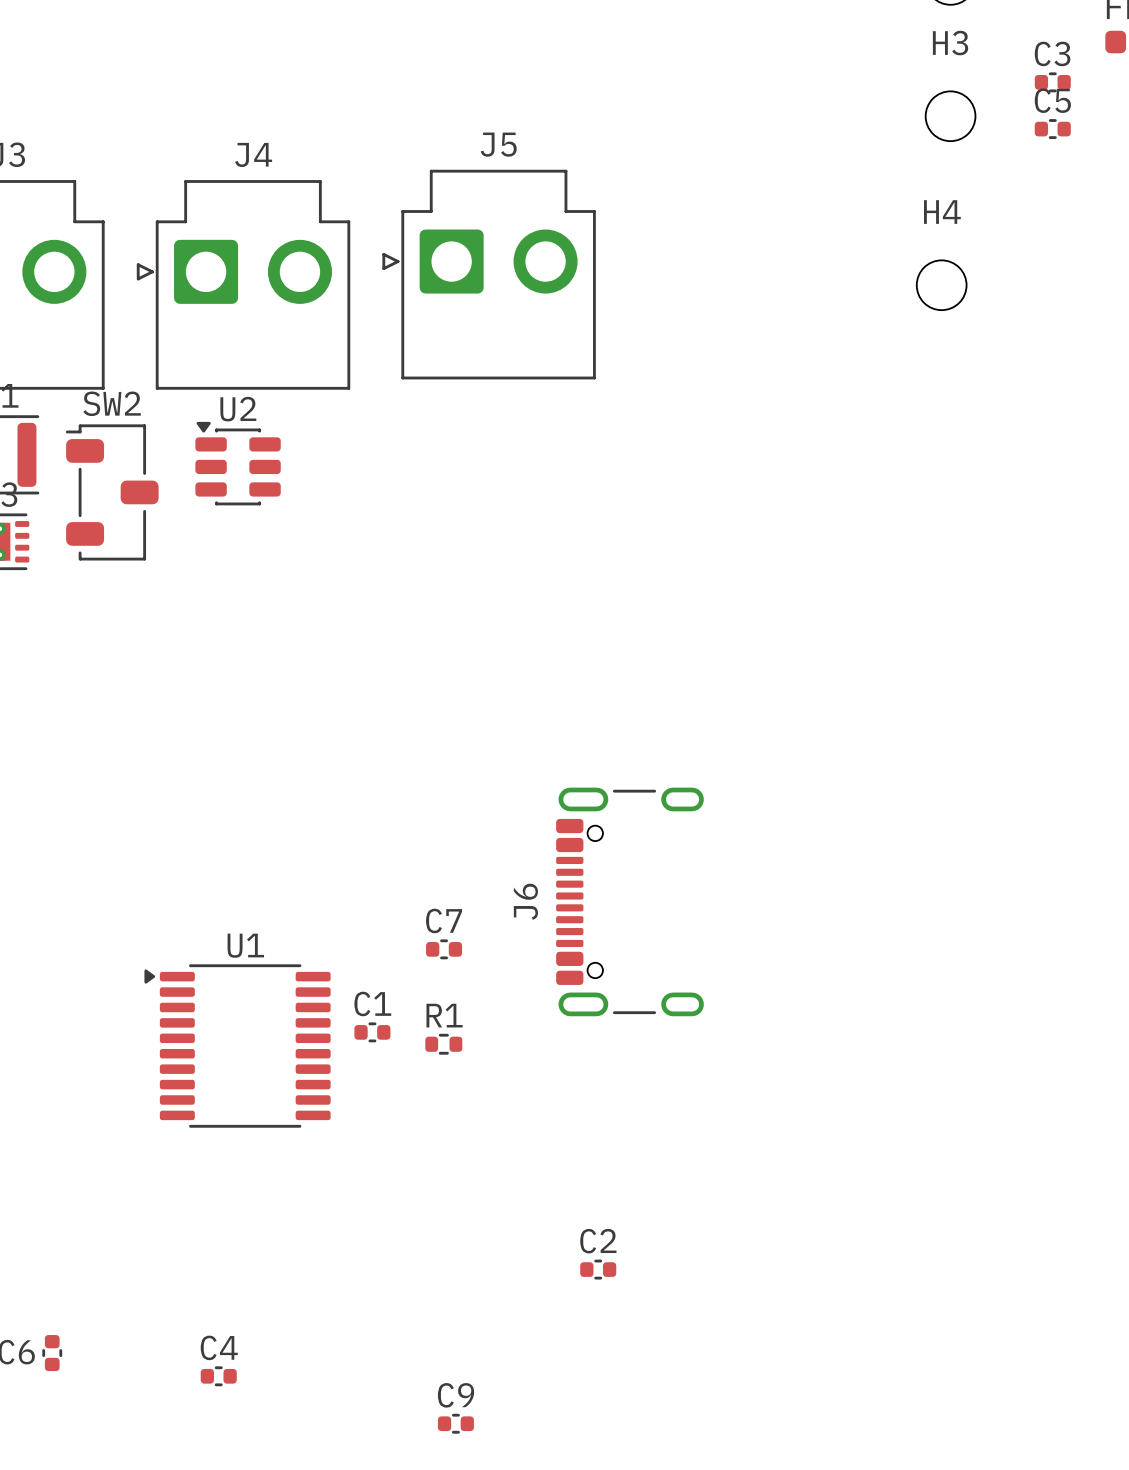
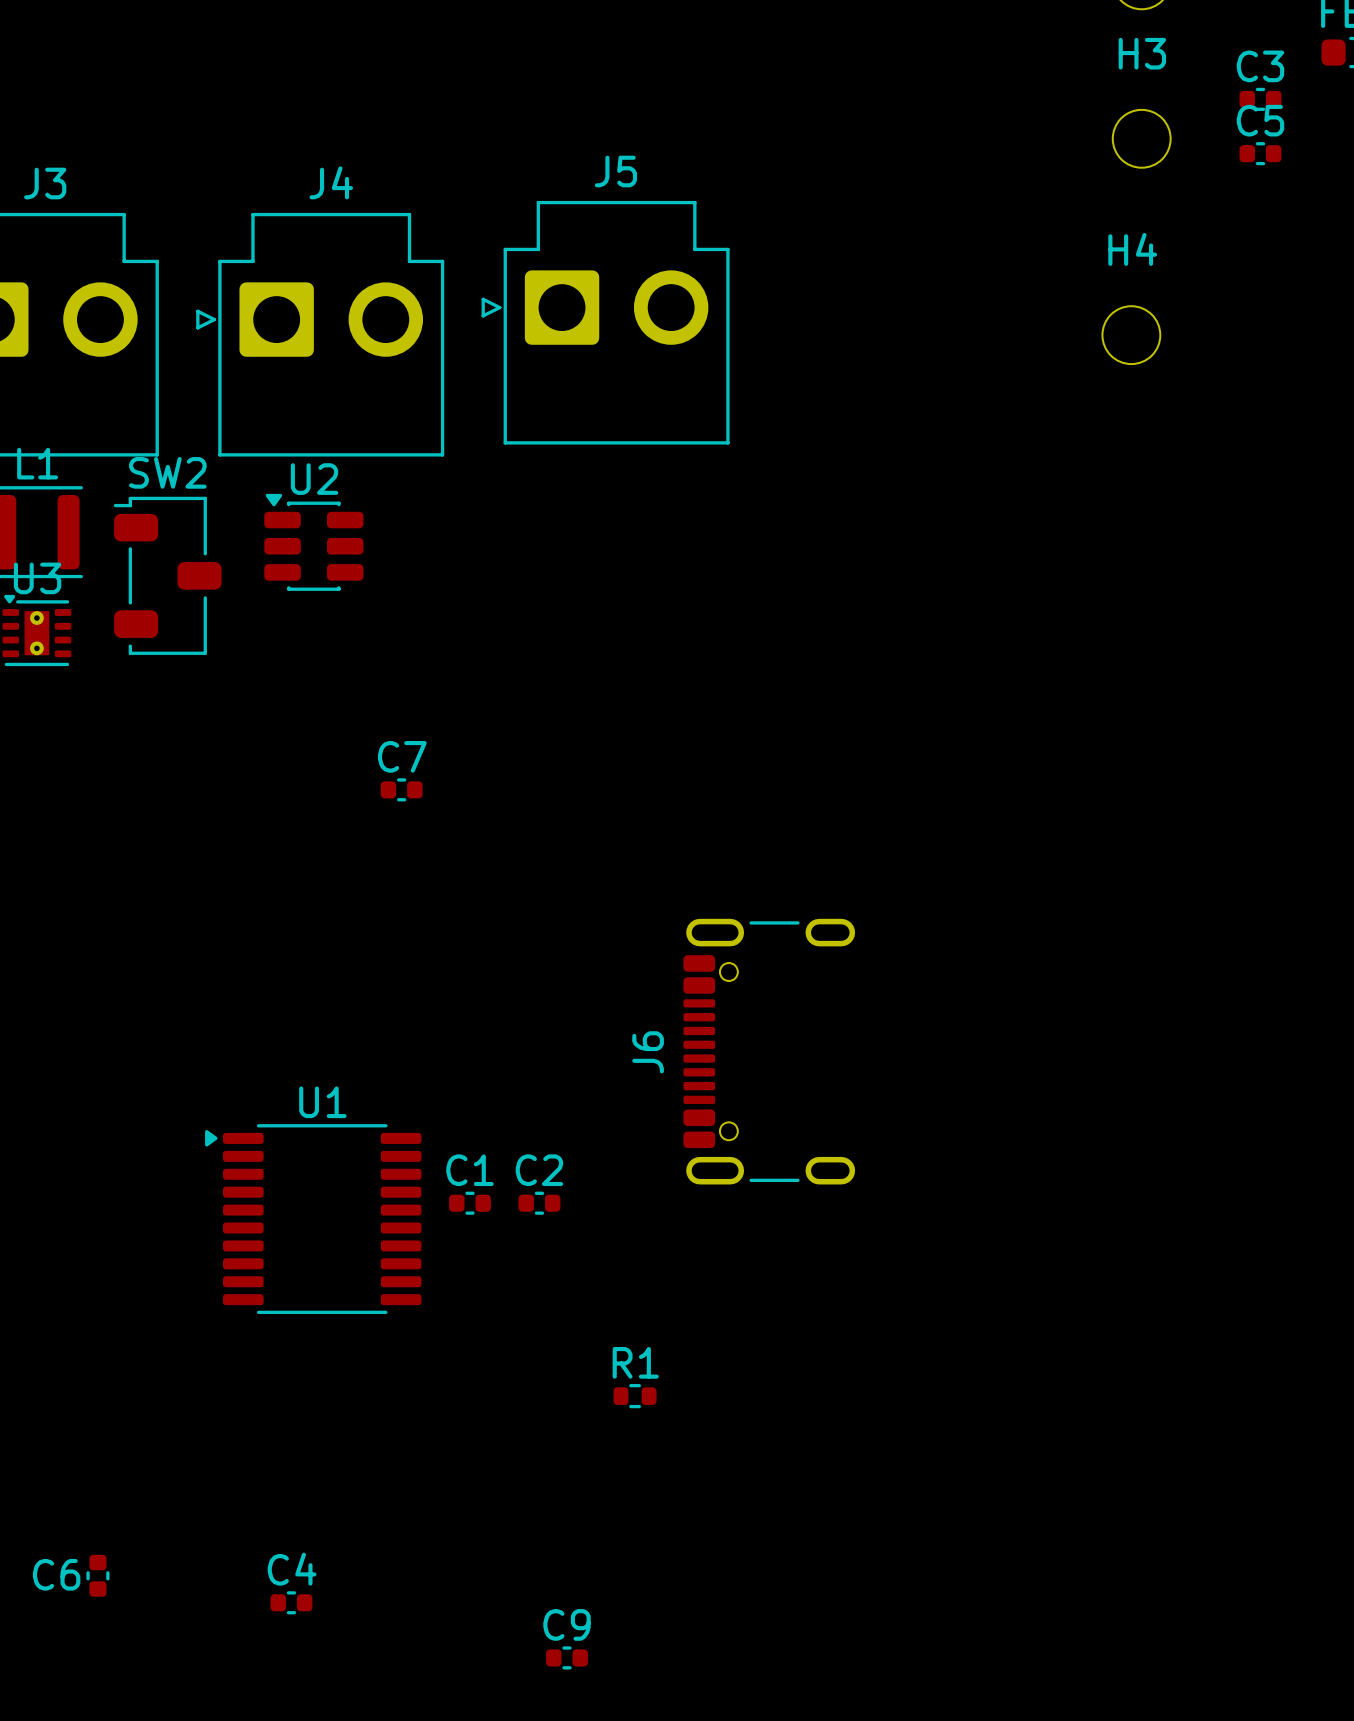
C7 position: (444, 949) -> (401, 789)
R1 position: (443, 1044) -> (635, 1396)
C2 position: (598, 1269) -> (539, 1203)

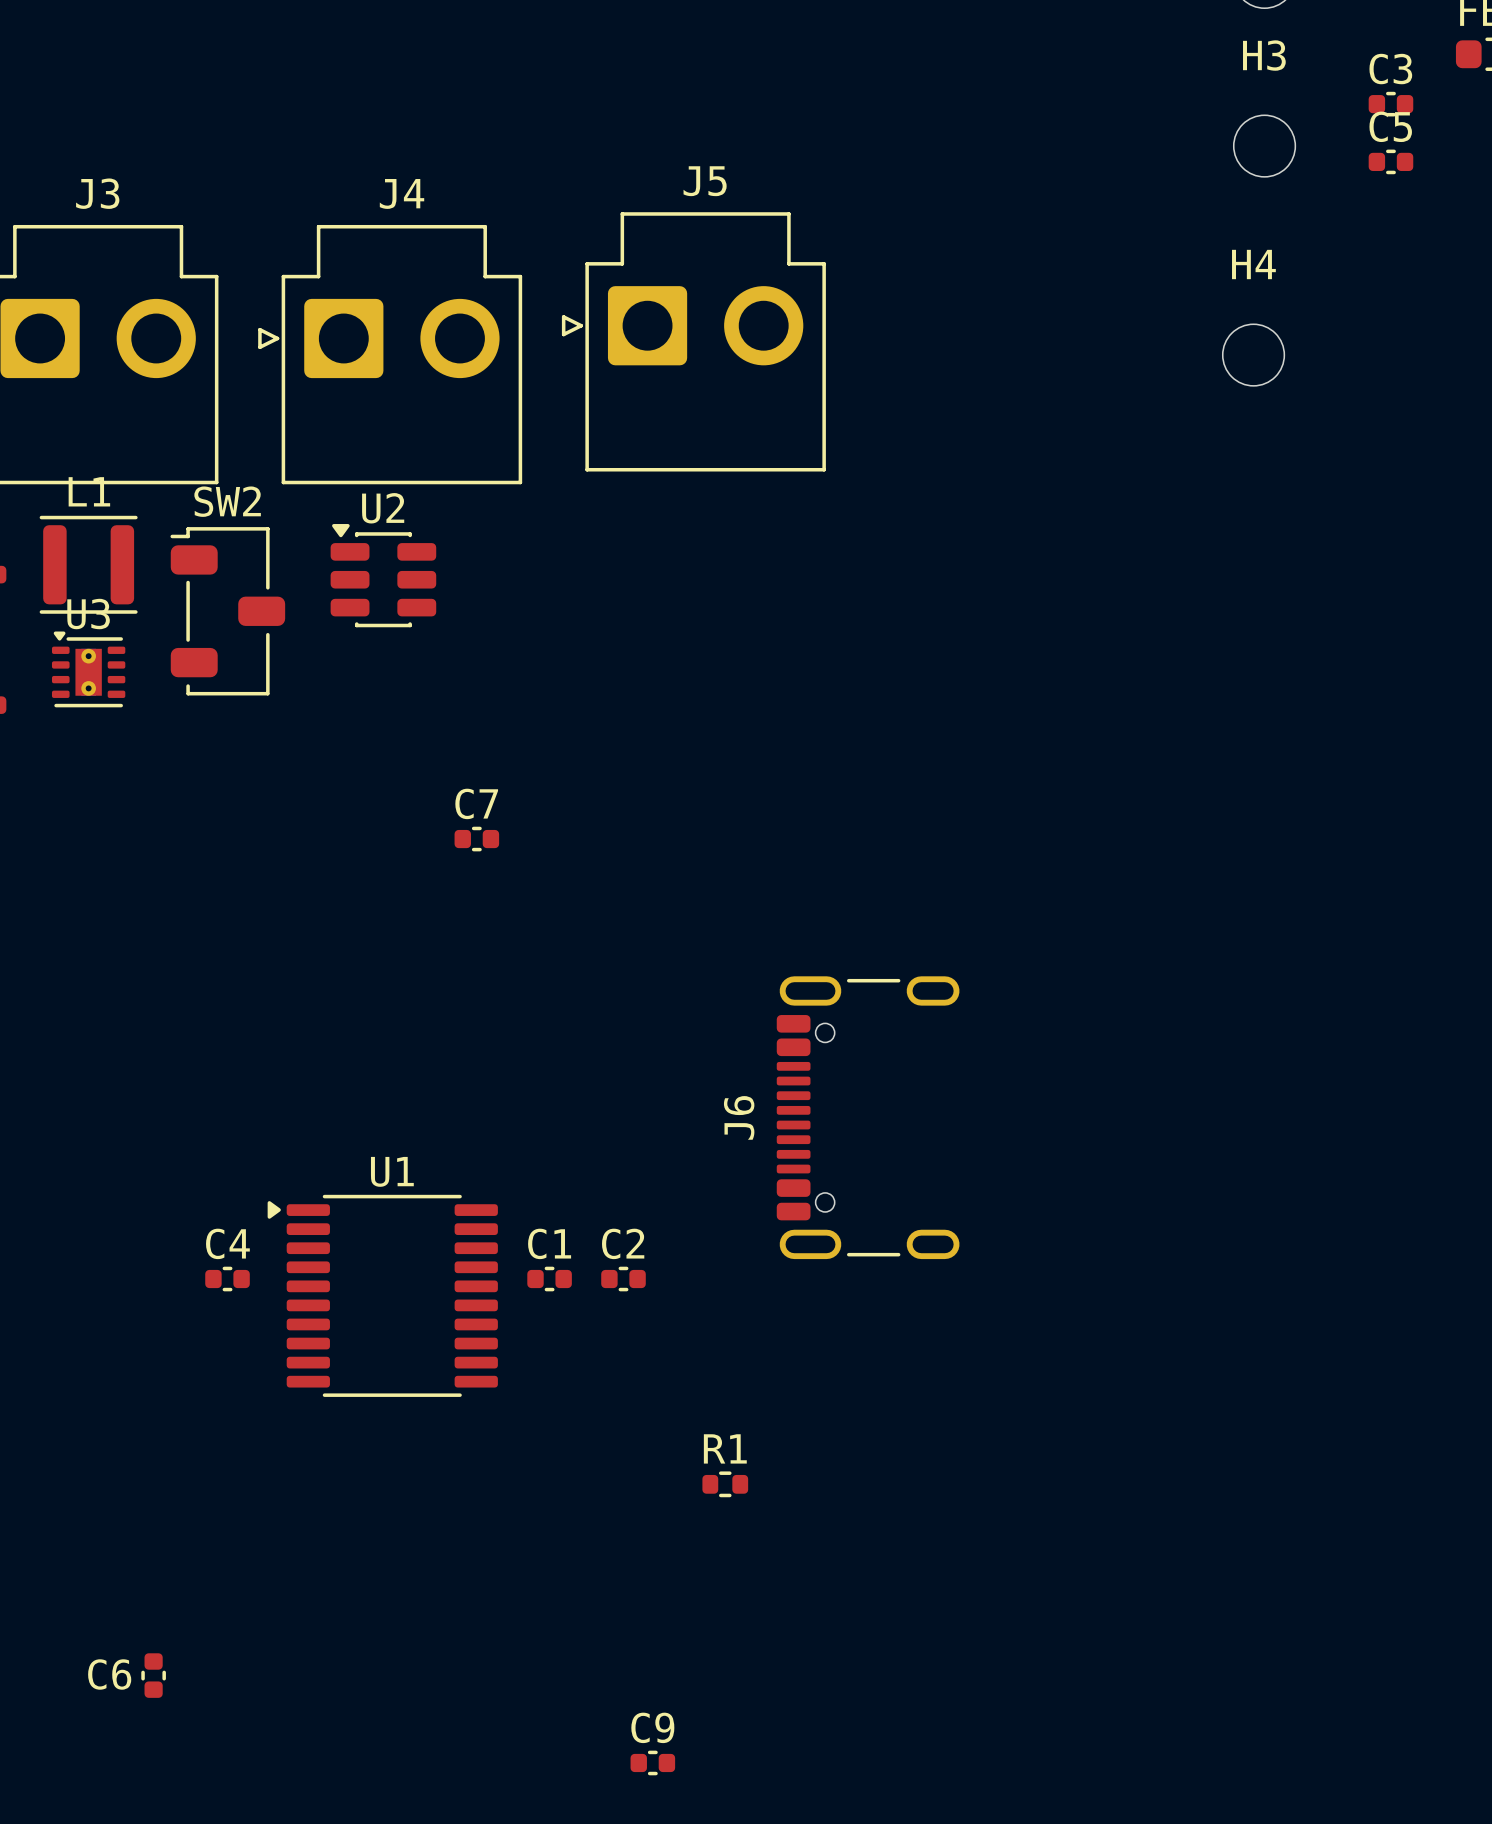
C4 position: (291, 1602) -> (227, 1279)

